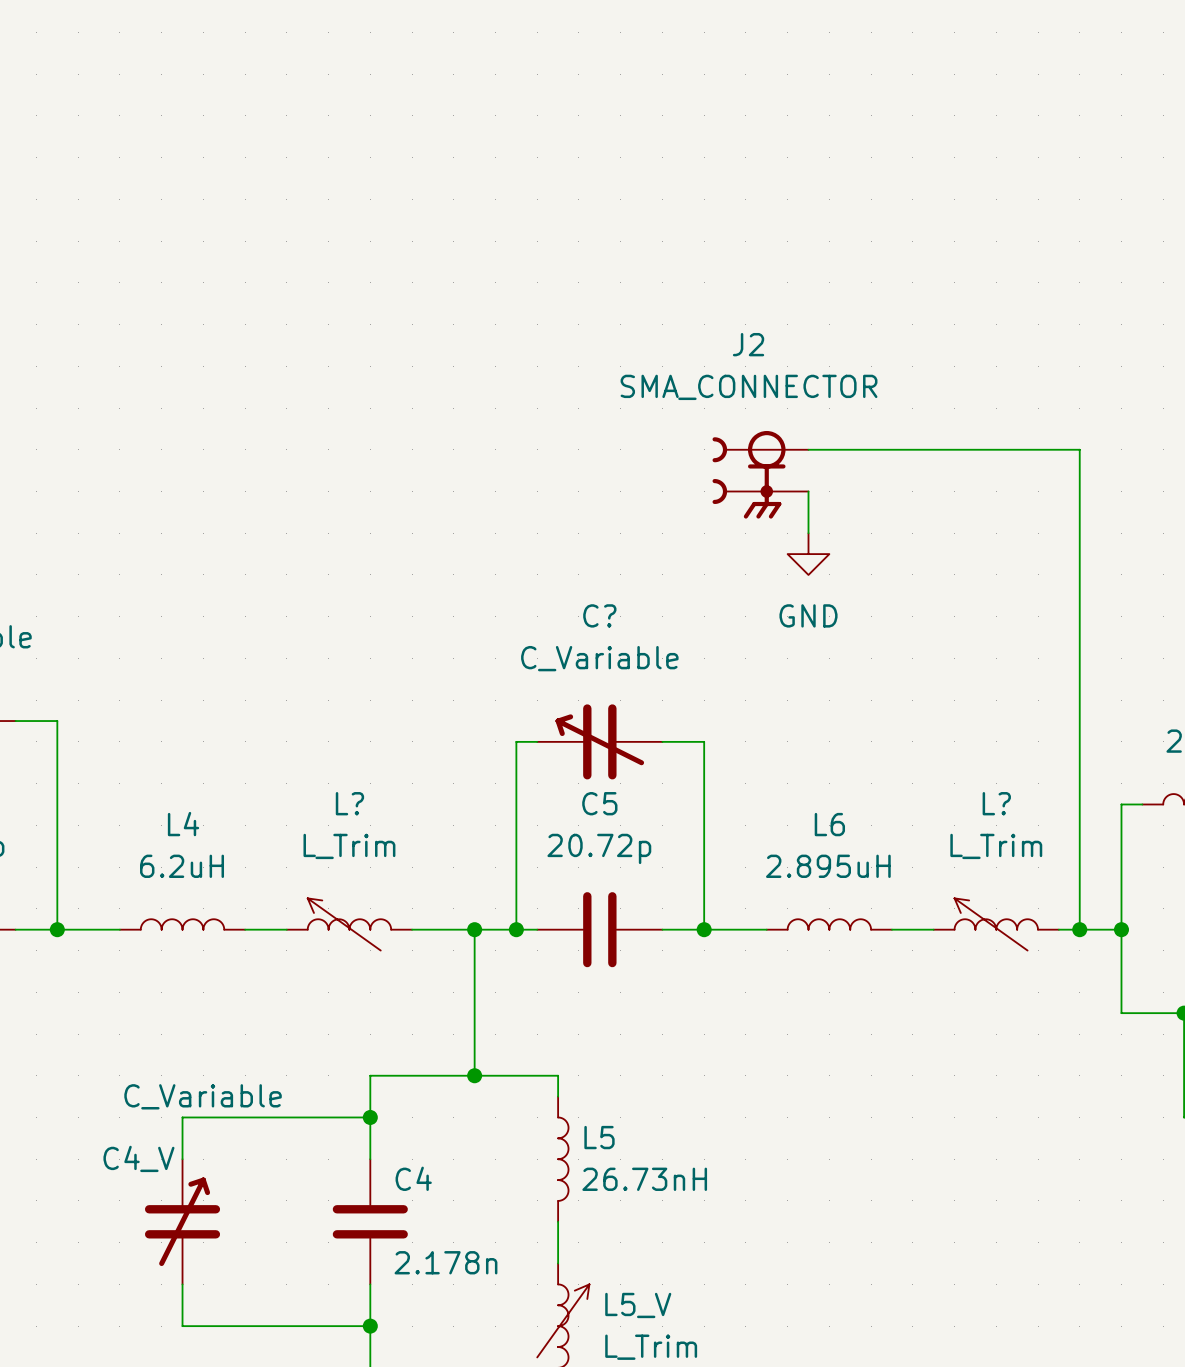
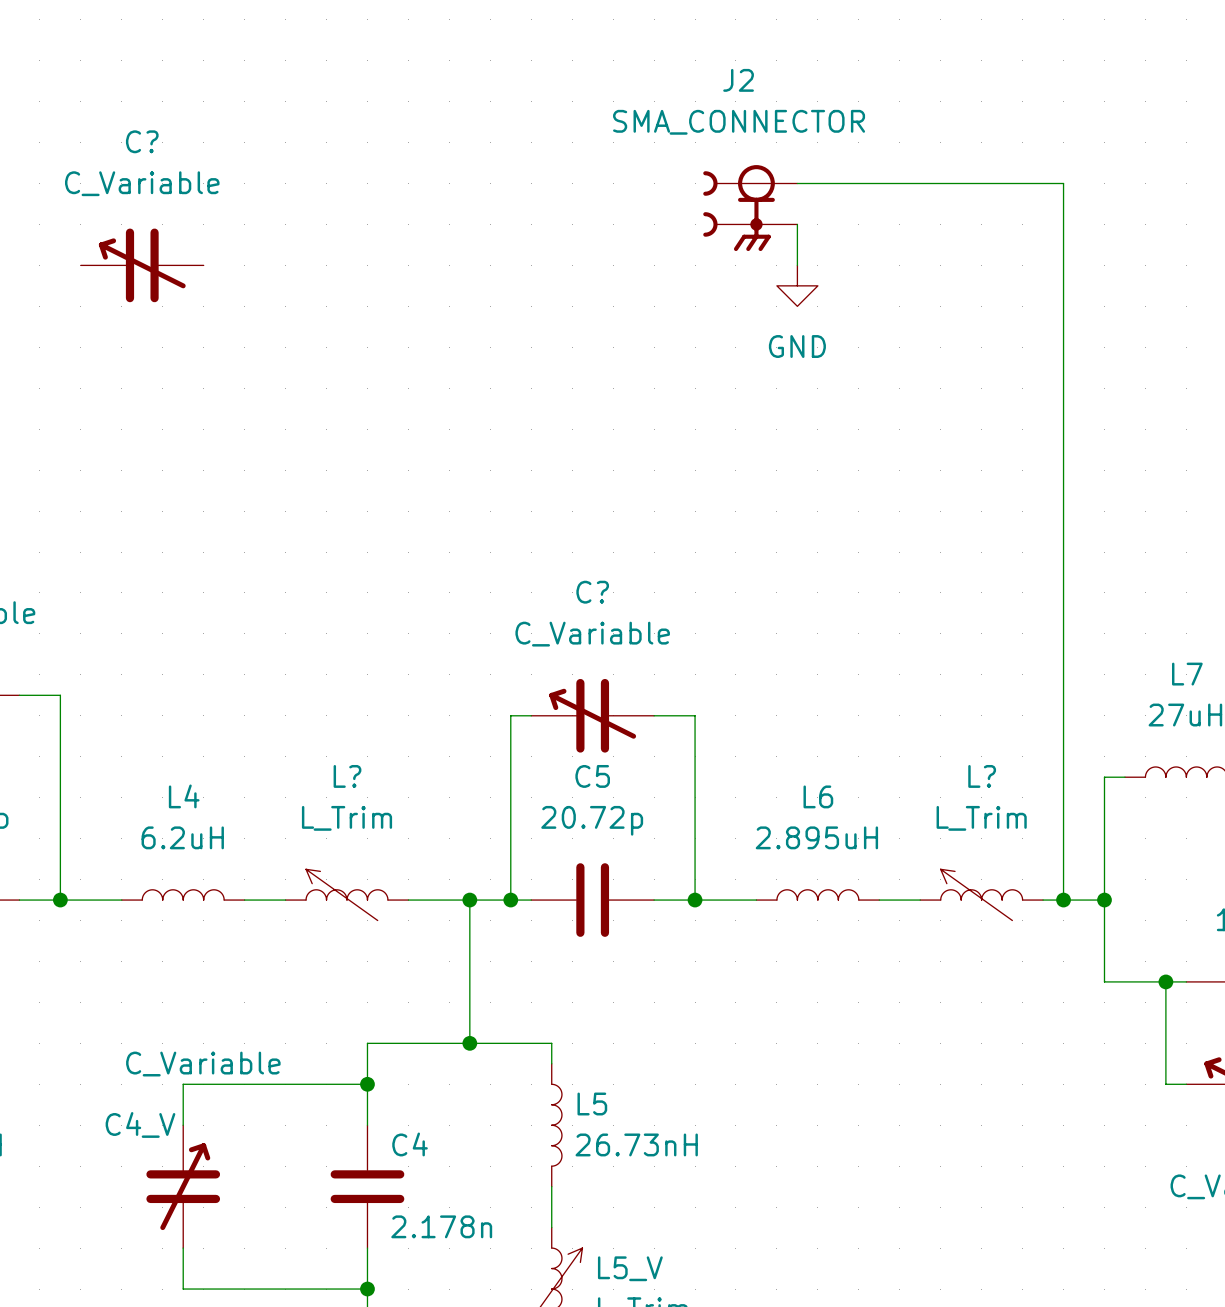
C?: none -> C_Variable (142, 265)
wire: (808, 449) (1079, 449) -> (797, 183) (1063, 183) (1063, 429)
J2 position: (760, 474) -> (750, 208)
wire: (808, 491) (808, 533) -> (797, 224) (797, 265)
power symbol position: GND (808, 554) -> GND (797, 285)

